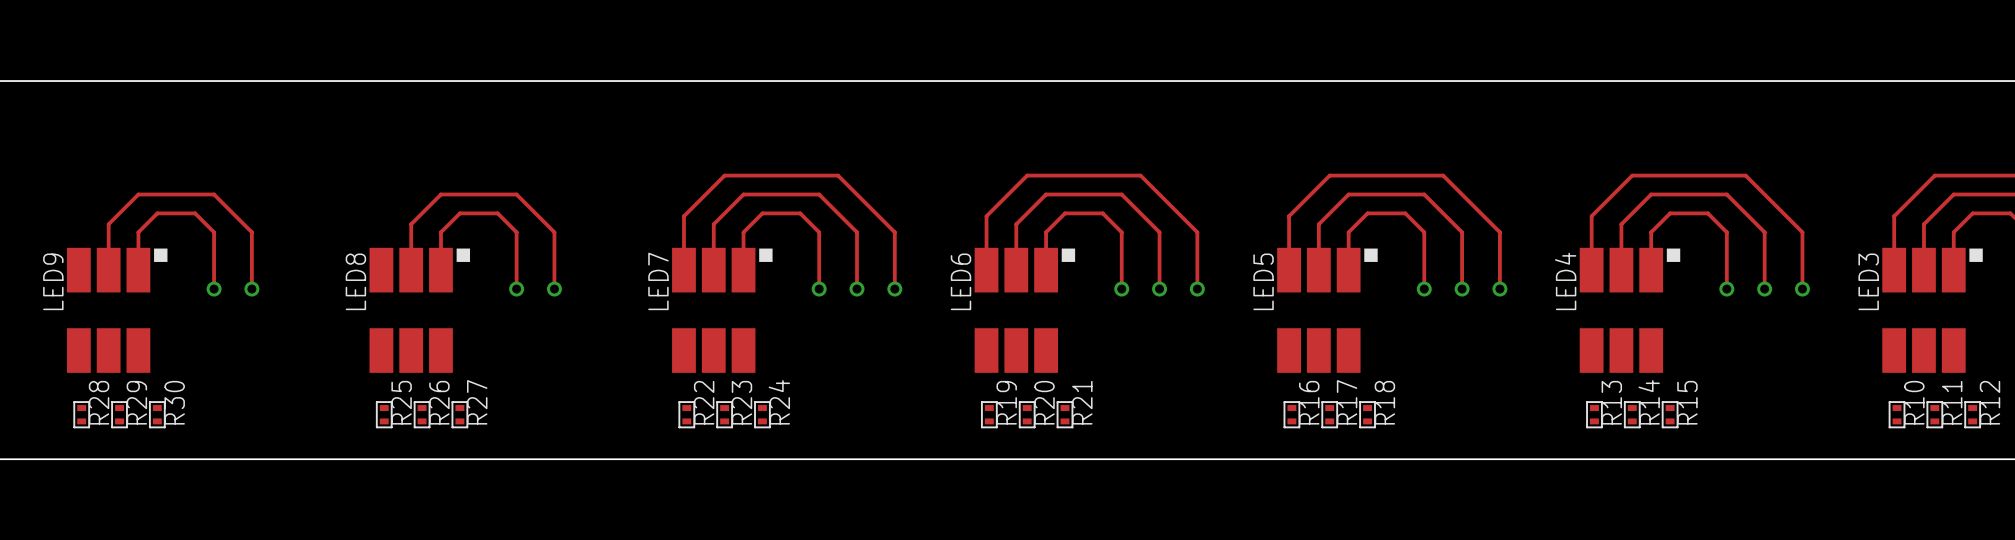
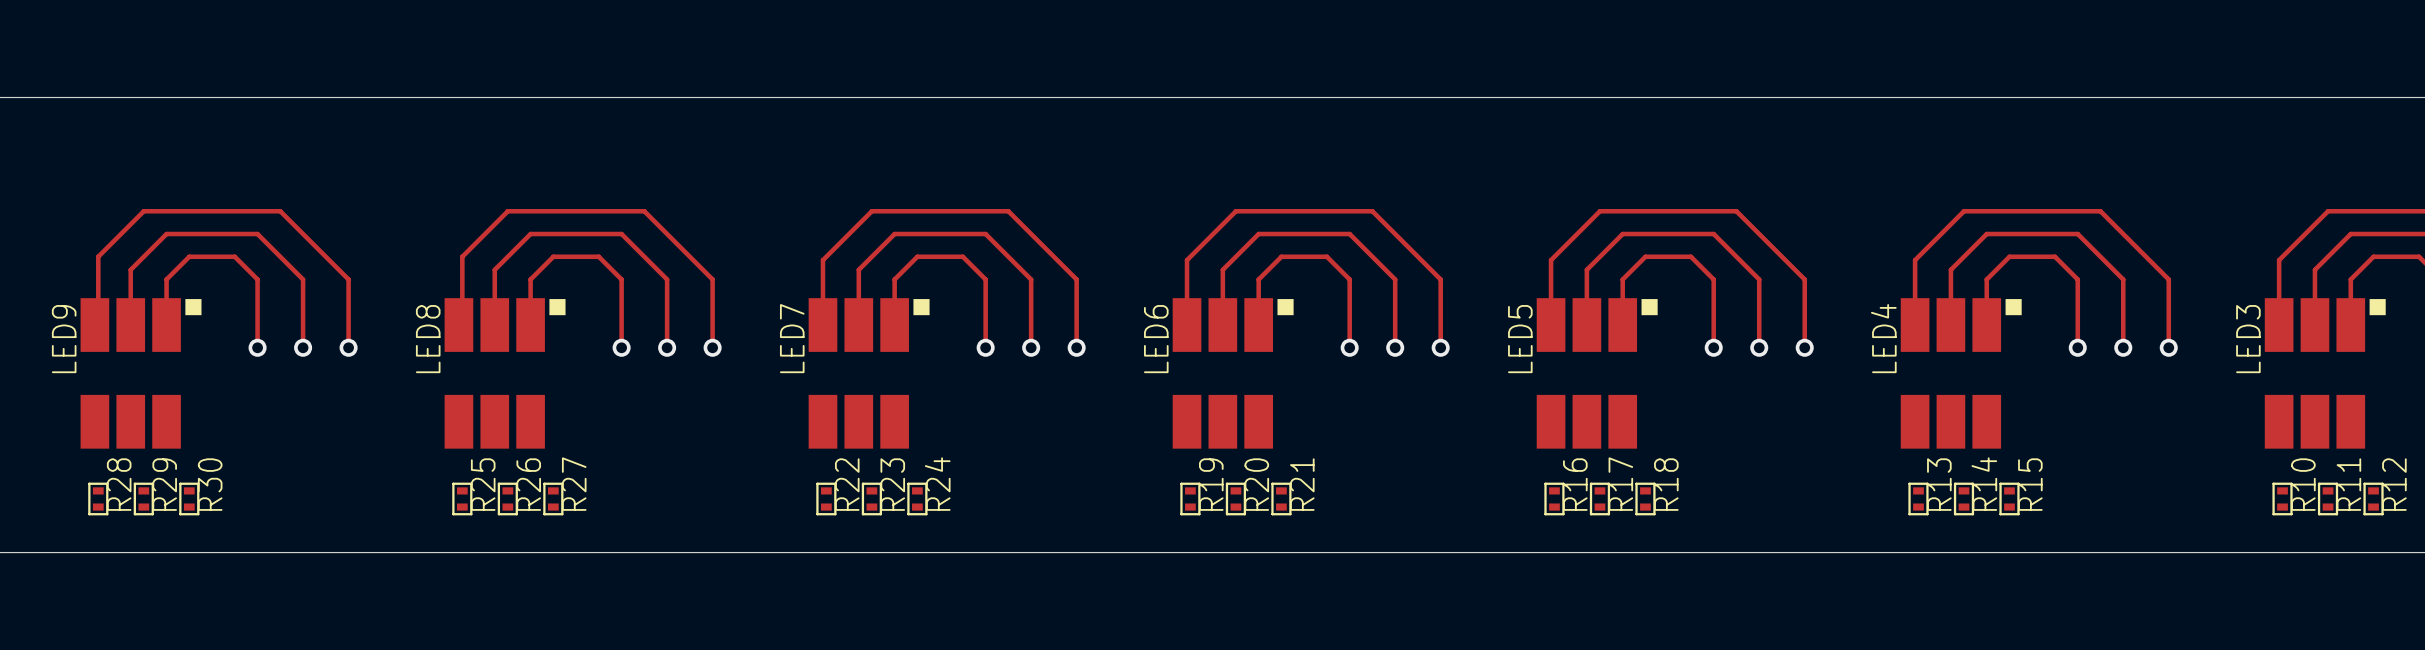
top track: none -> (94, 325) (98, 321) (98, 256) (143, 211) (280, 211) (348, 279) (348, 347)
top track: none -> (458, 325) (462, 321) (462, 256) (507, 211) (644, 211) (712, 279) (712, 347)
via: none -> (348, 347)
via: none -> (712, 347)

